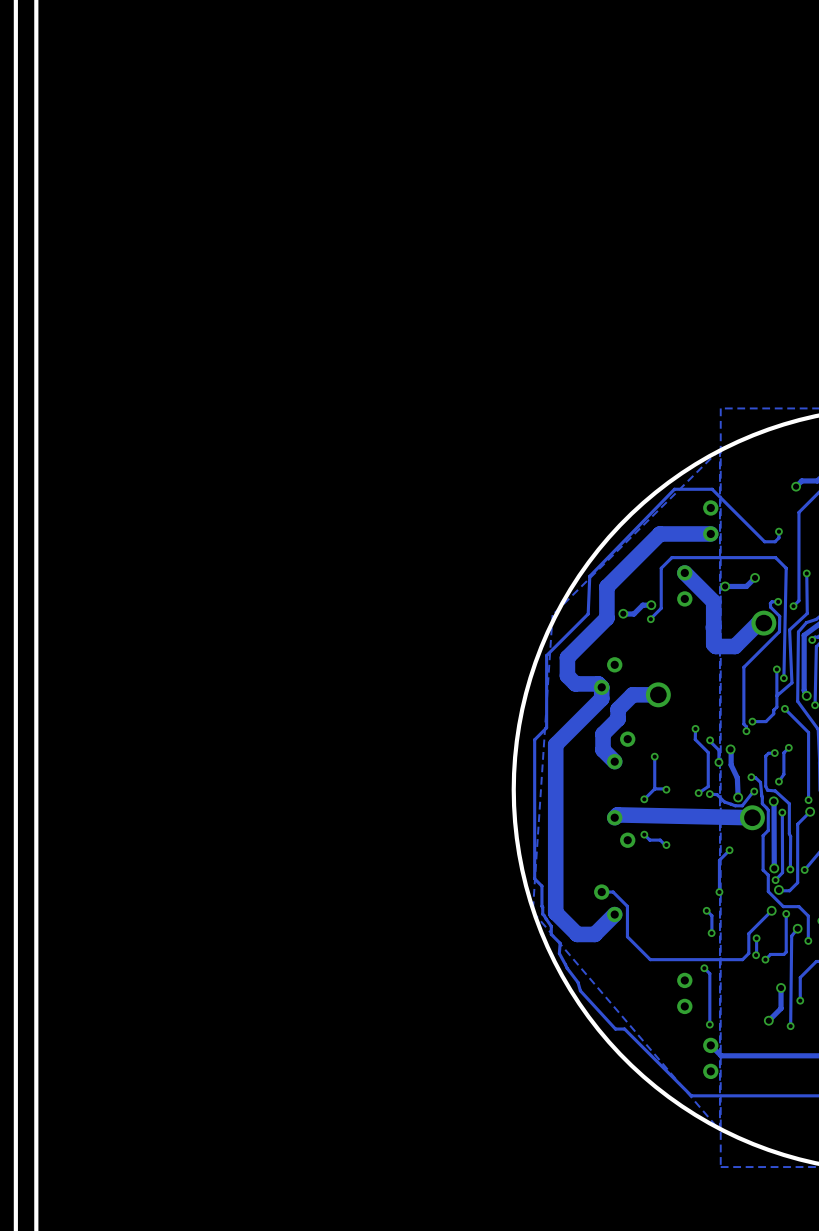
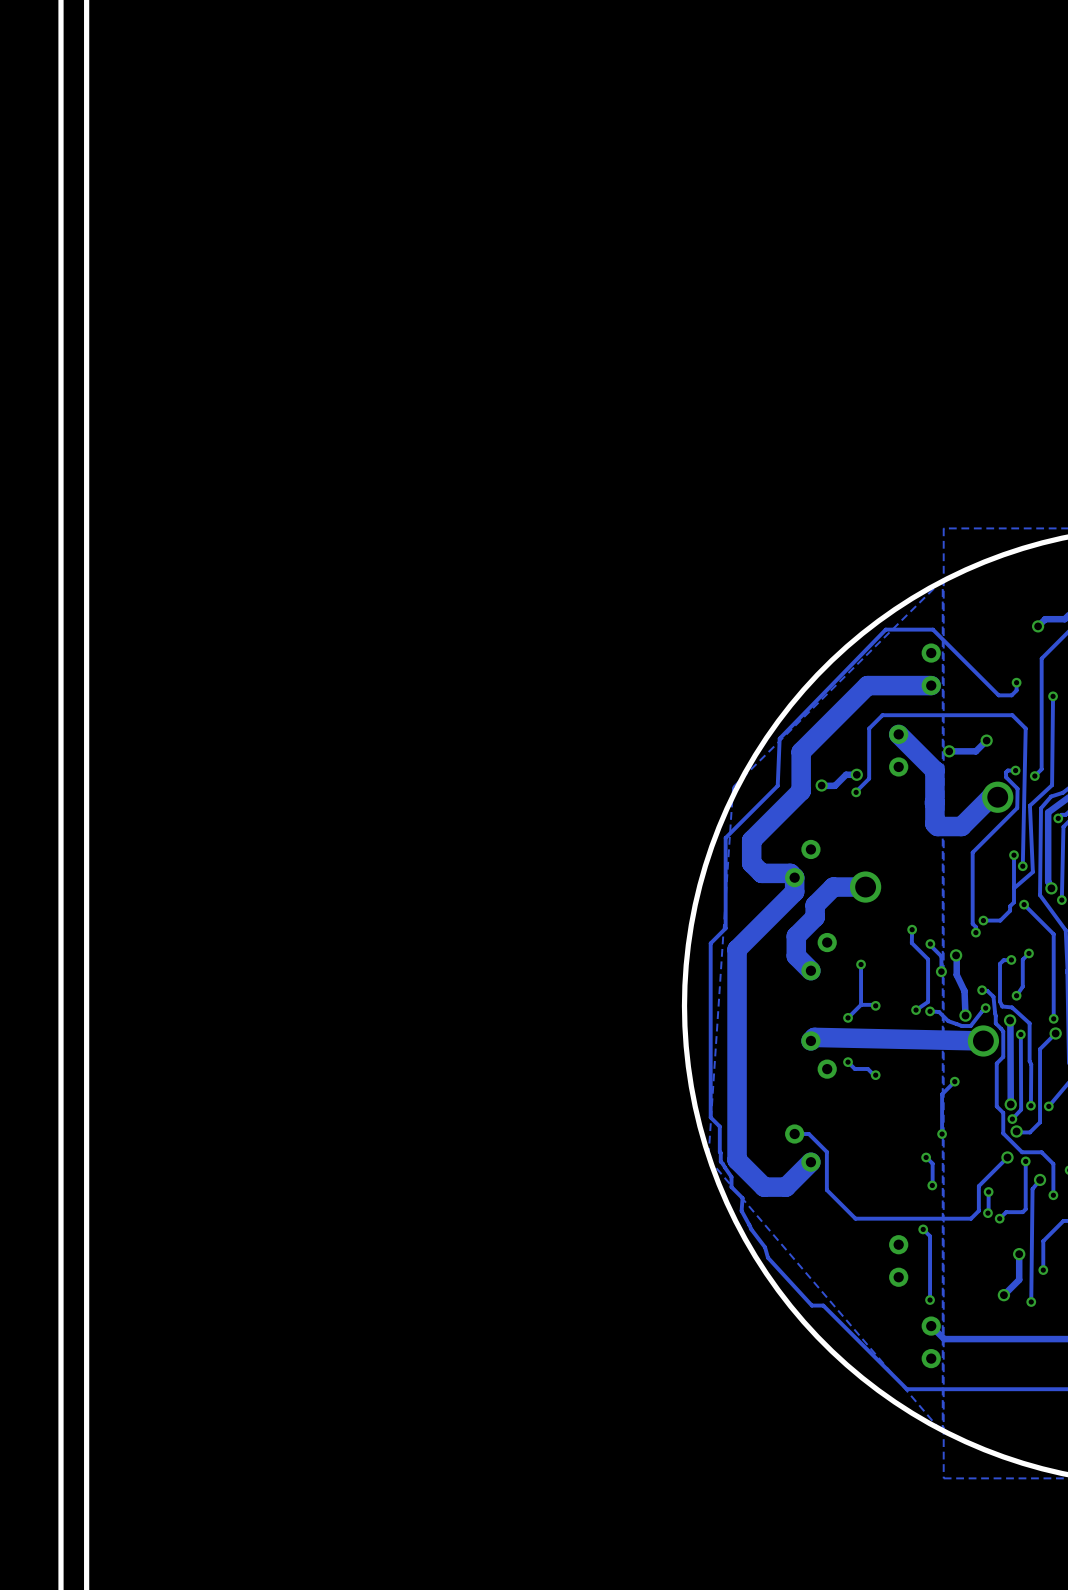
track: (806, 573) (807, 613) -> (1053, 696) (1052, 785)
via position: (806, 573) -> (1053, 696)

